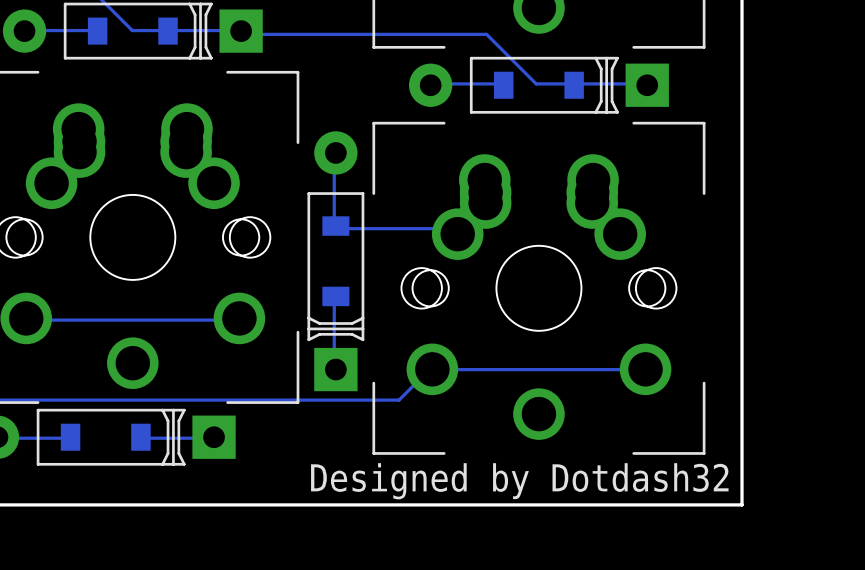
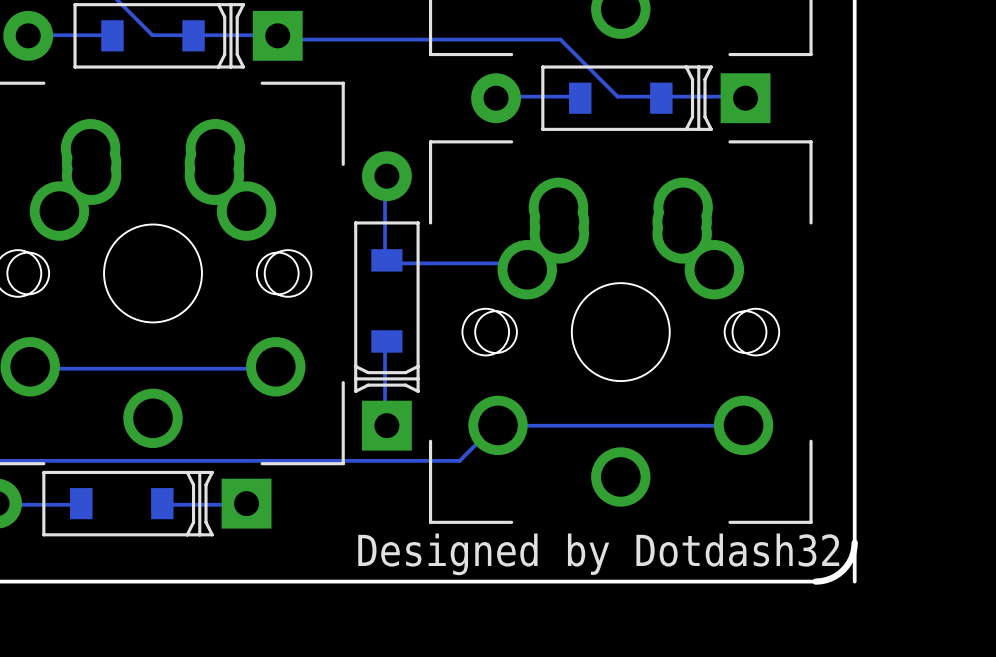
board edge: (742, 504) (708, 504) -> (854, 542) (851, 557) (843, 570) (830, 578) (815, 581)

